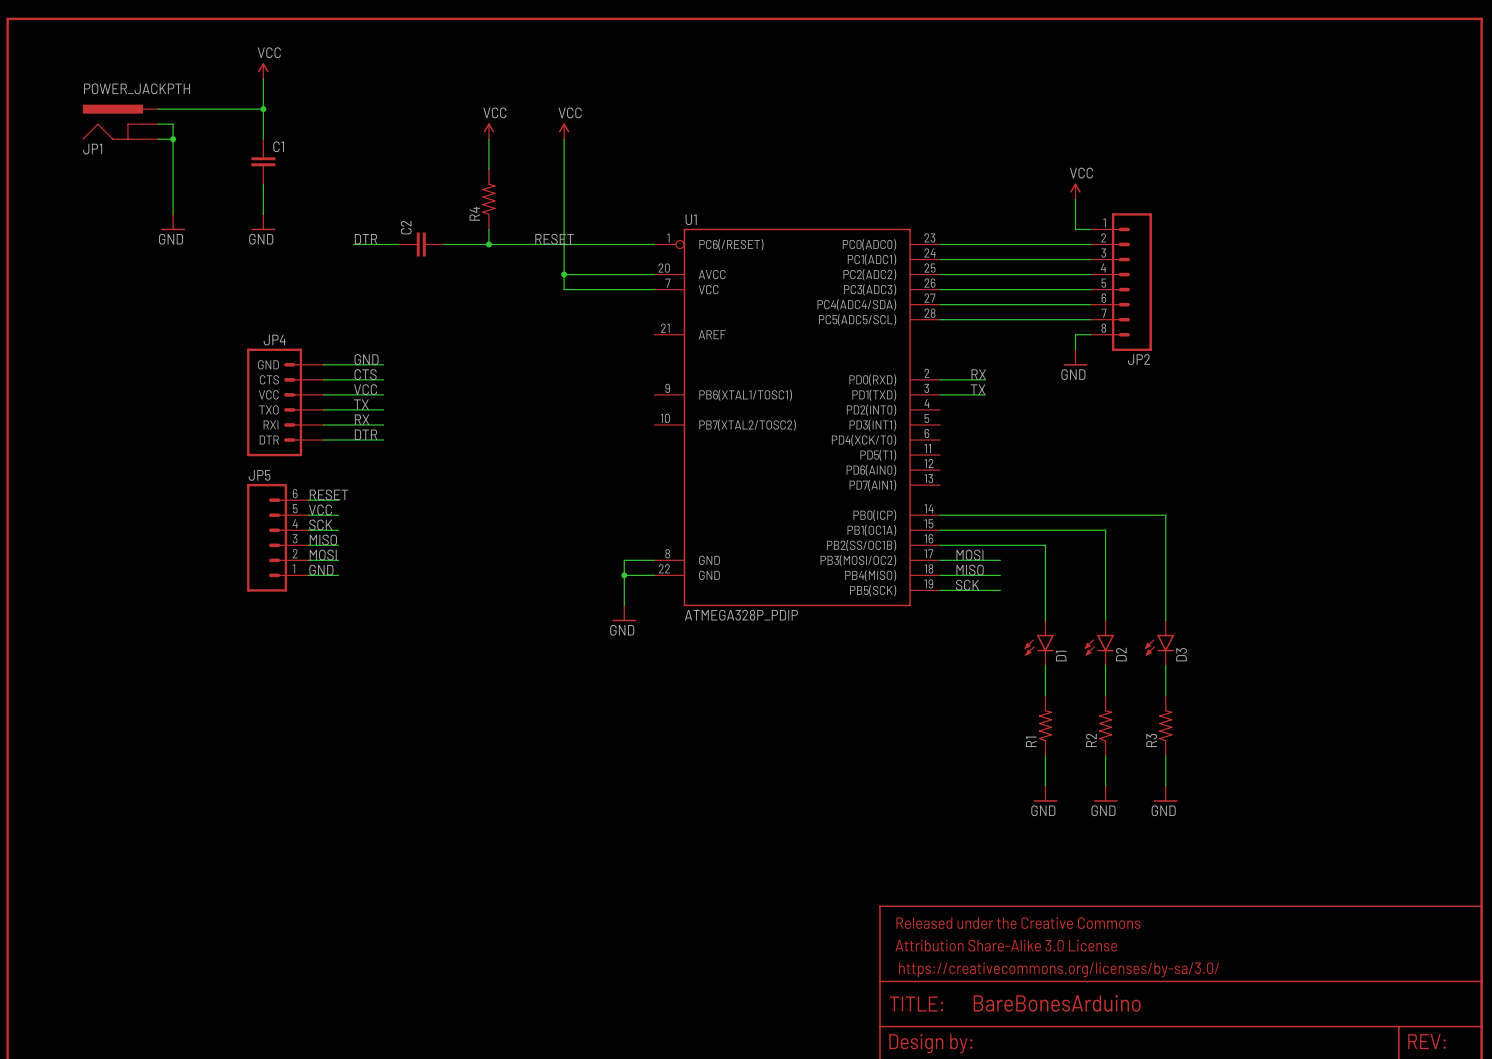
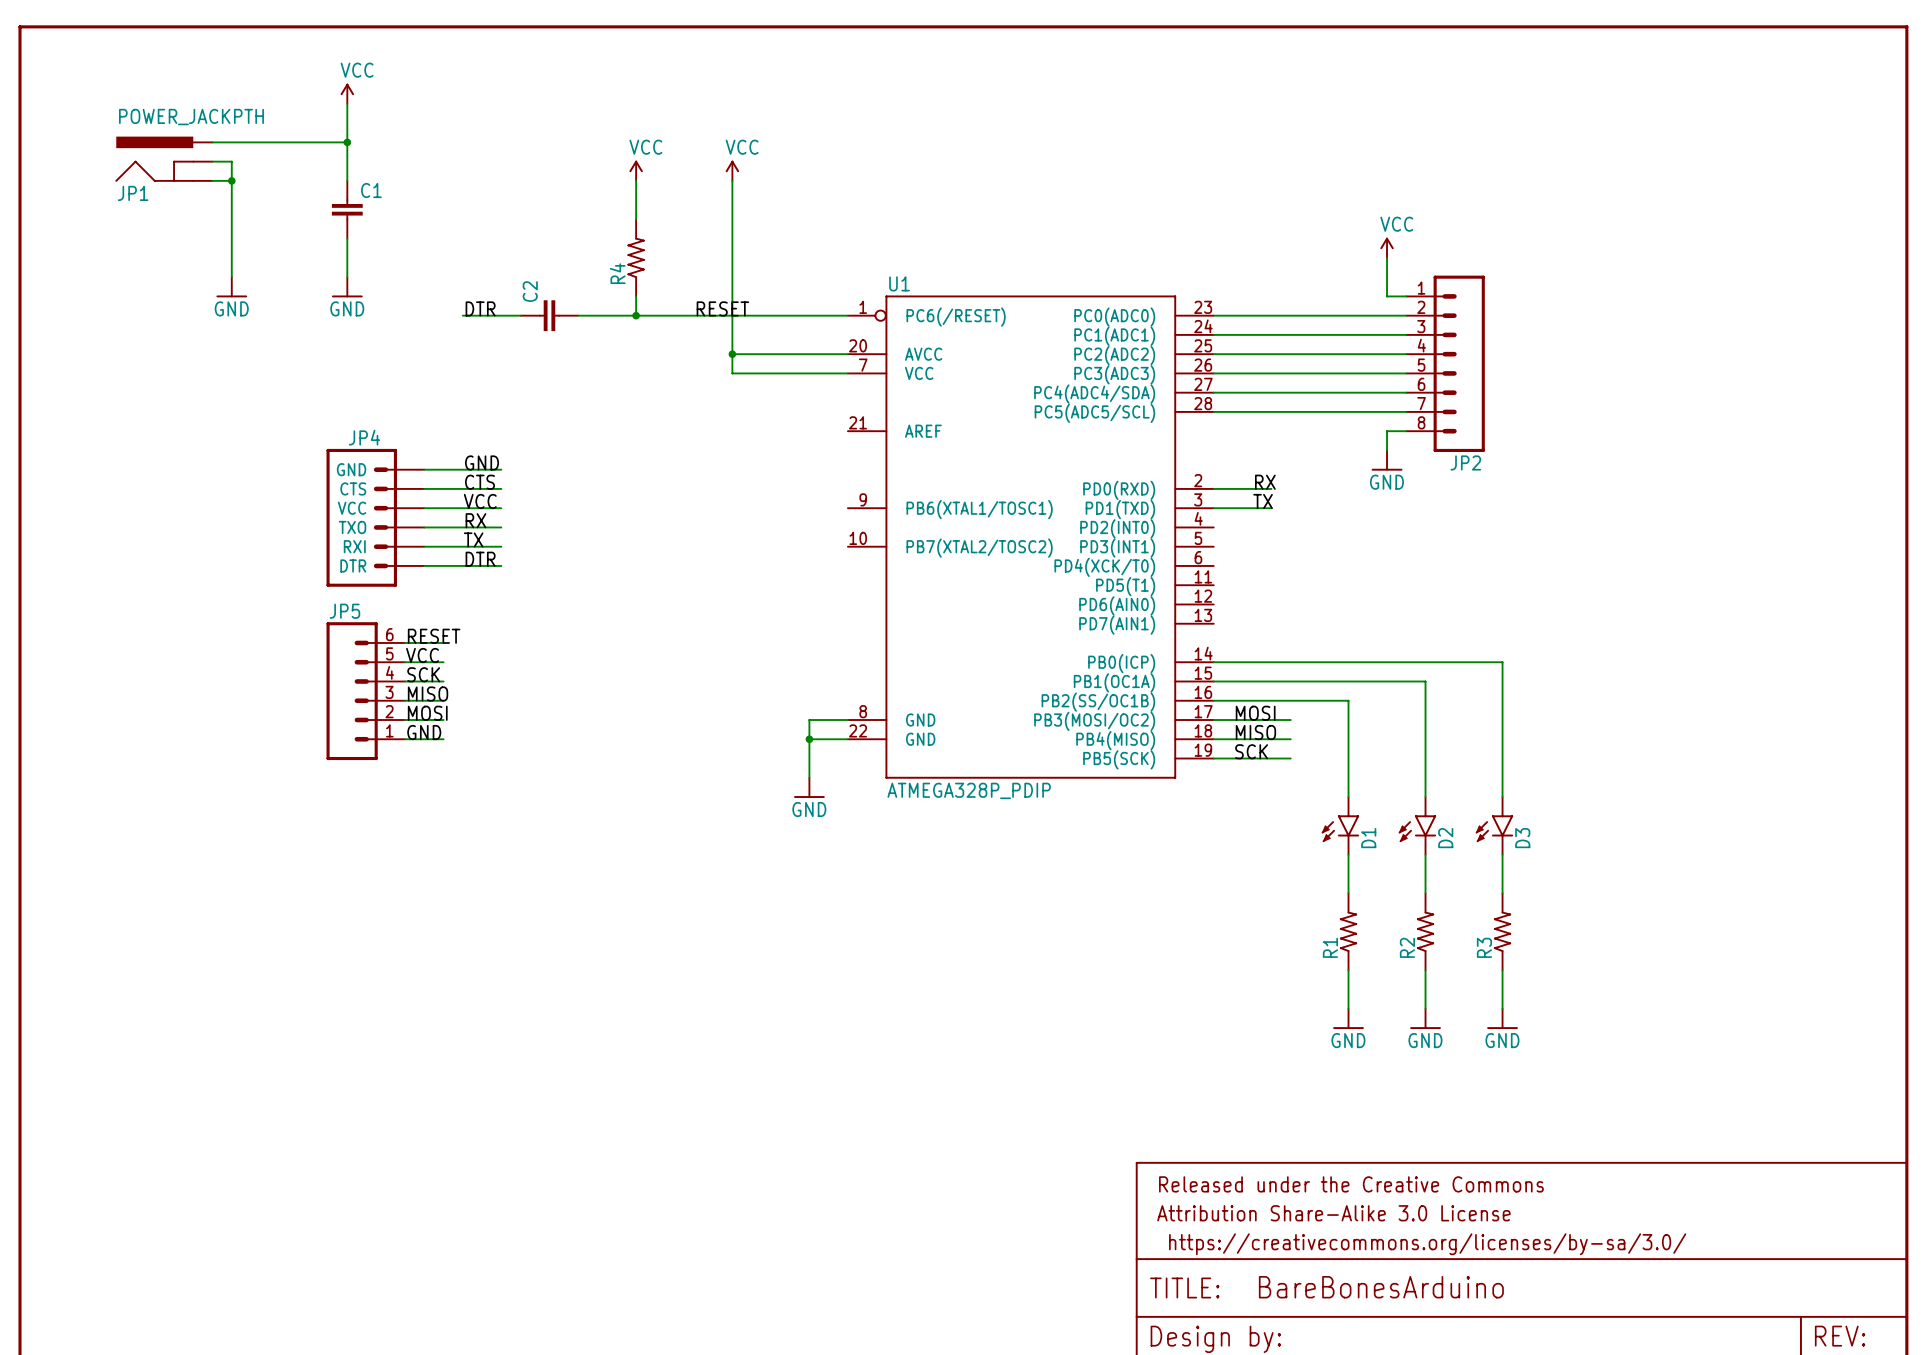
label: TX (361, 404) -> RX (475, 520)
label: RX (362, 419) -> TX (473, 539)

